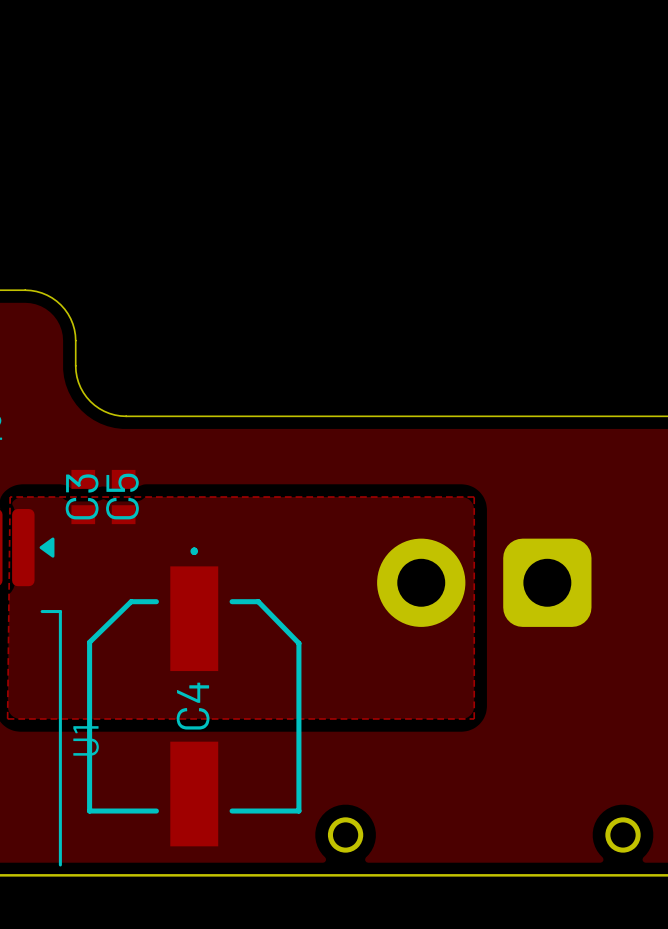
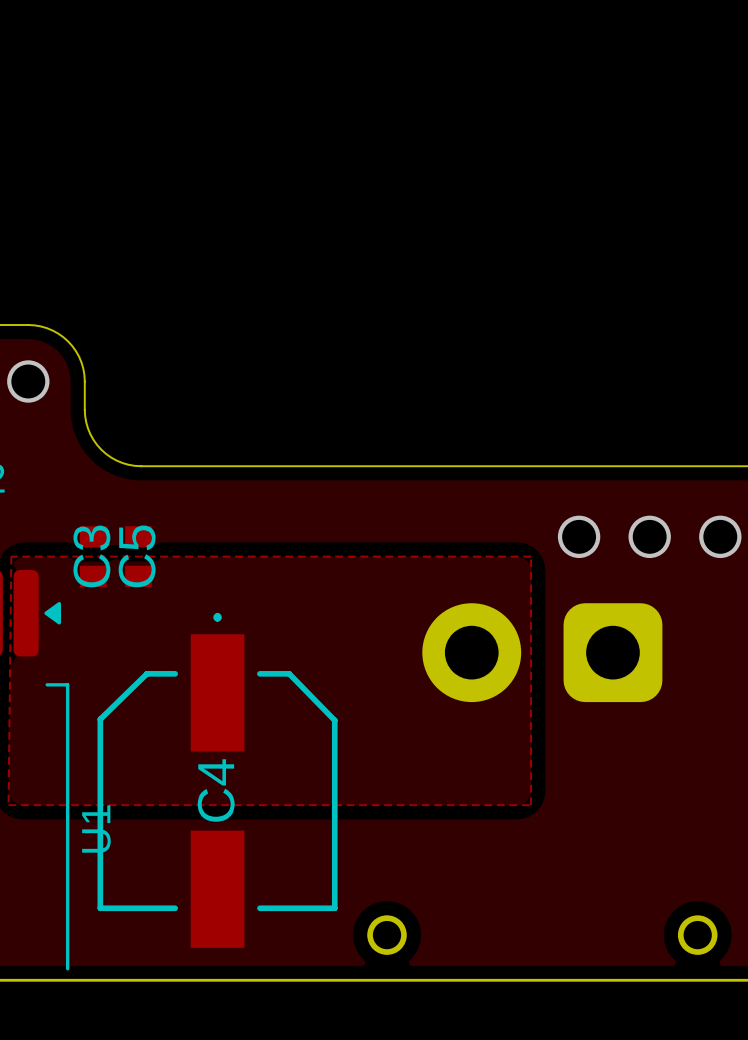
via: none -> (28, 381)
via: none -> (579, 536)
via: none -> (649, 536)
via: none -> (720, 536)

